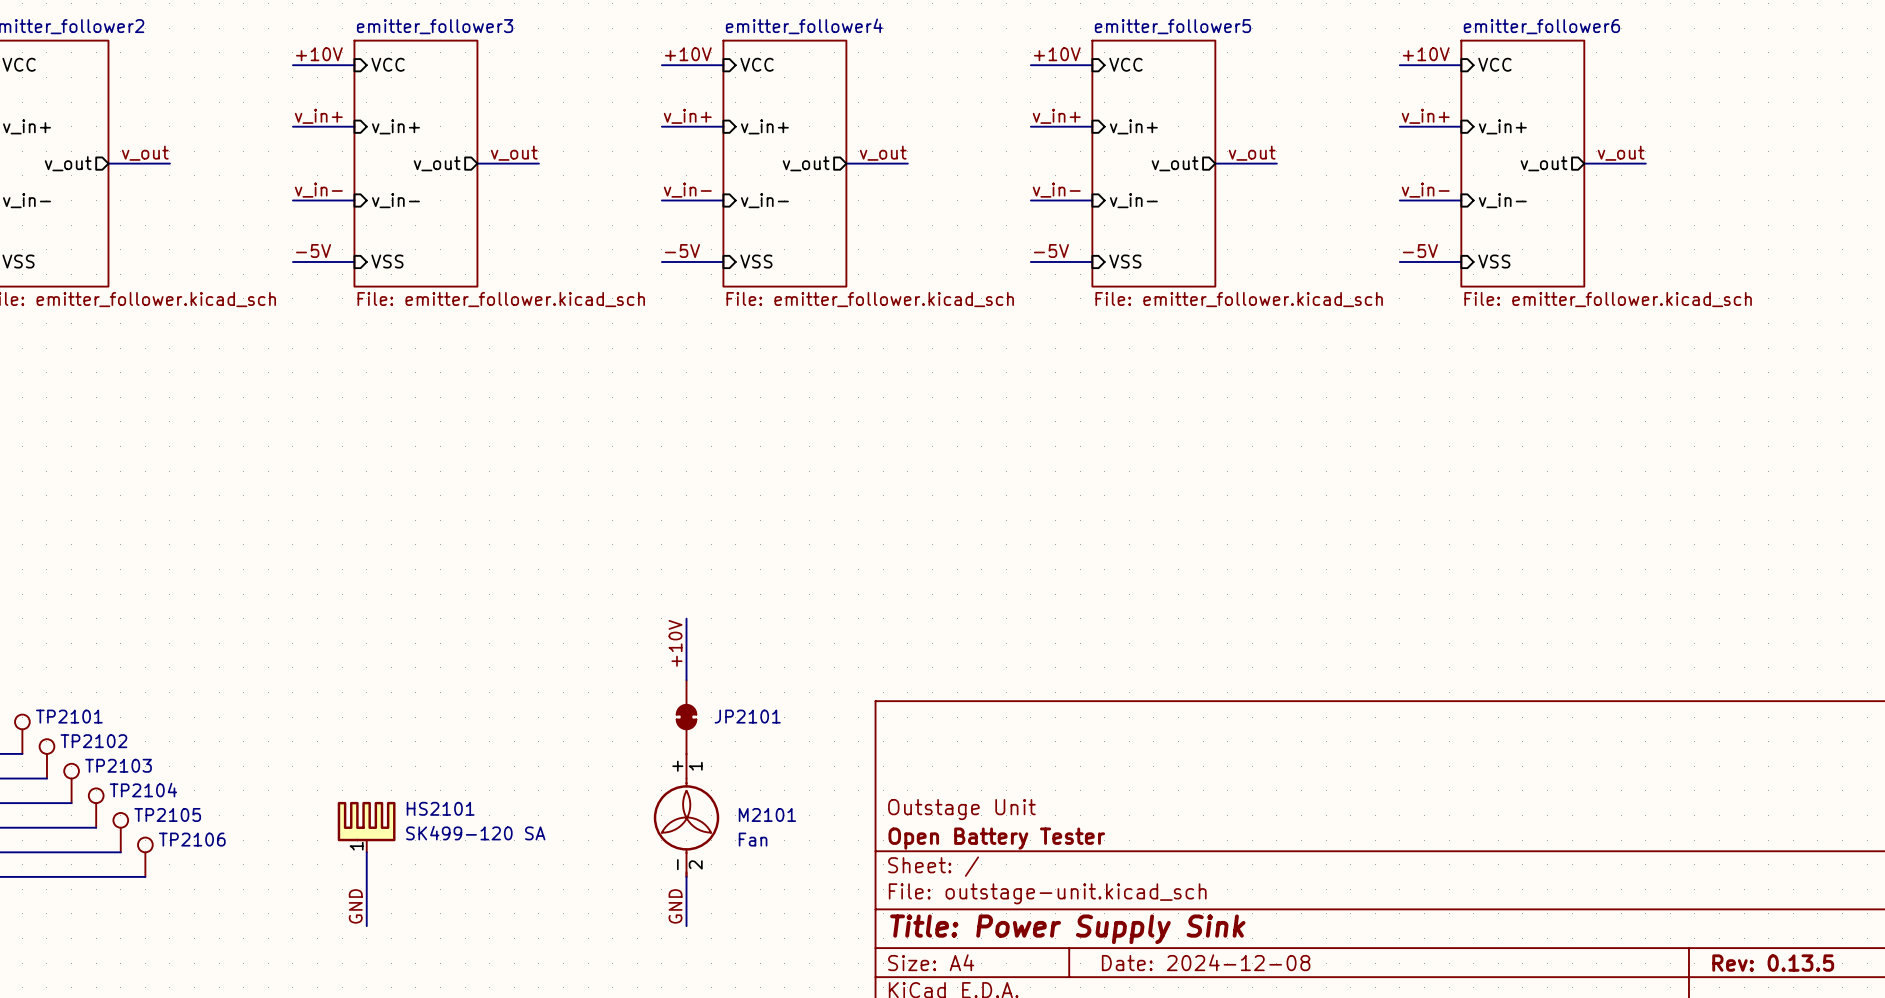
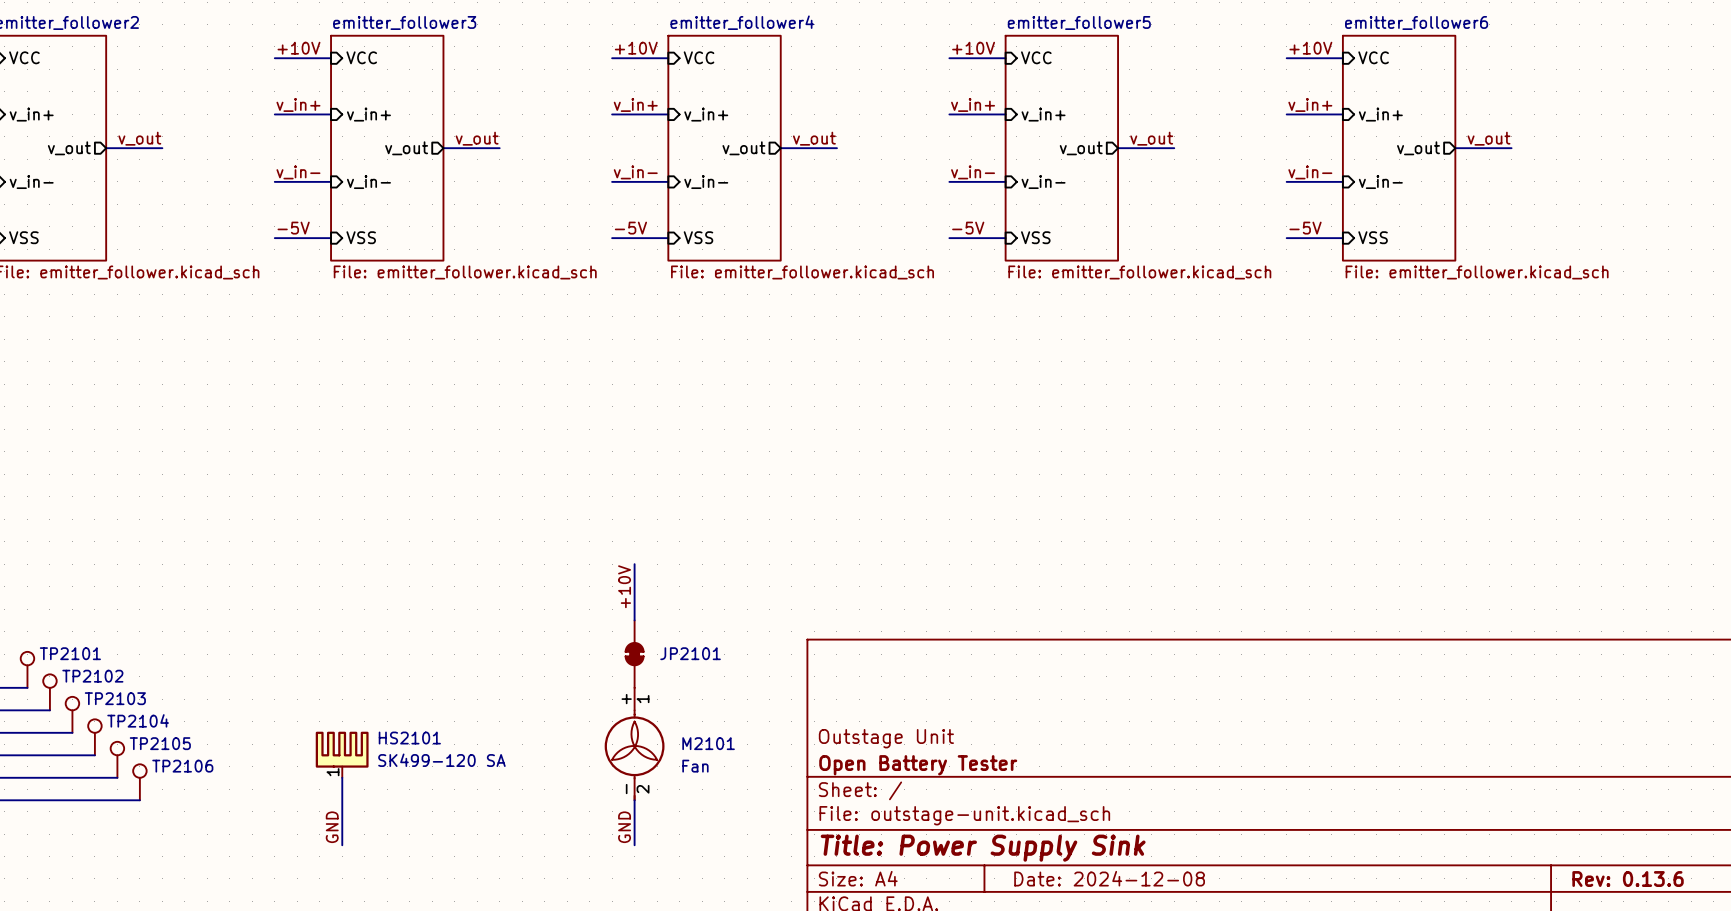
title block: Rev: 0.13.5 (1773, 963) -> Rev: 0.13.6 (1628, 879)

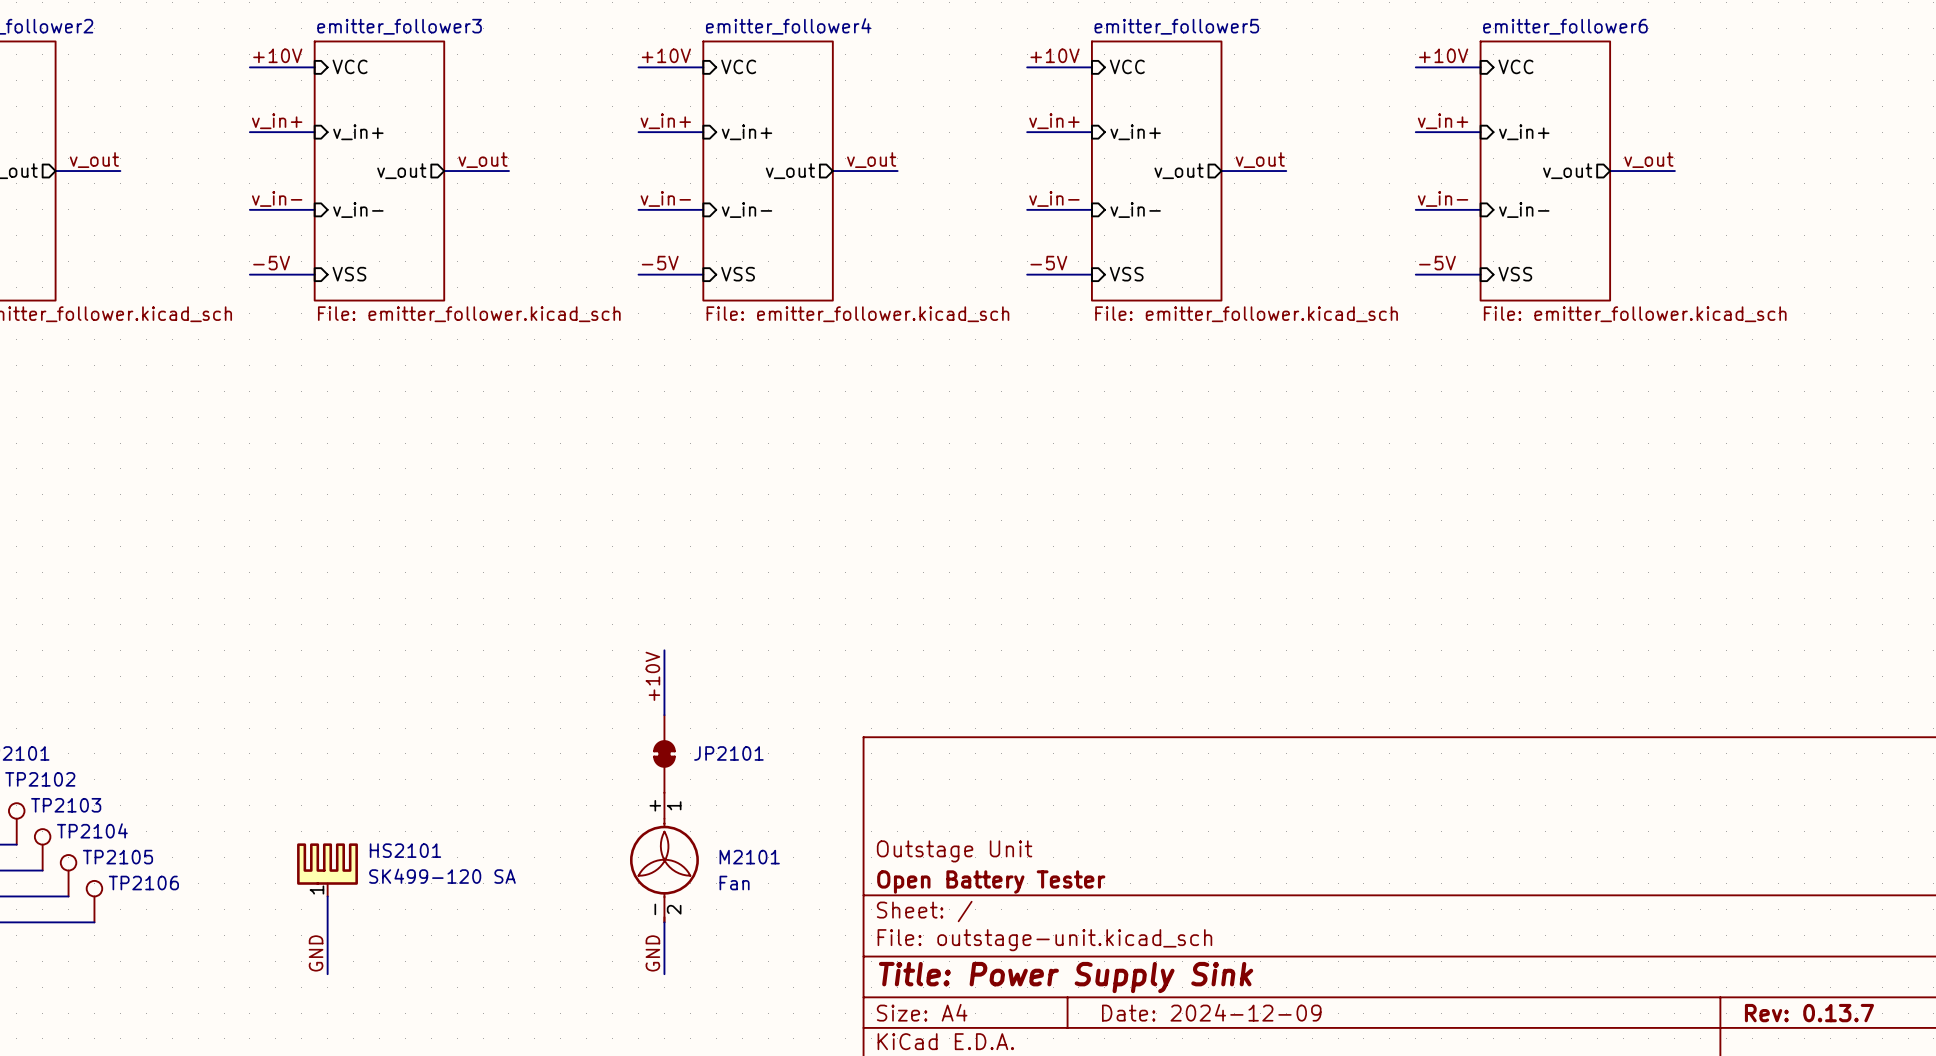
title block: Date: 2024-12-08 (1109, 878) -> Date: 2024-12-09 (1211, 1012)
title block: Rev: 0.13.6 (1628, 879) -> Rev: 0.13.7 (1809, 1013)

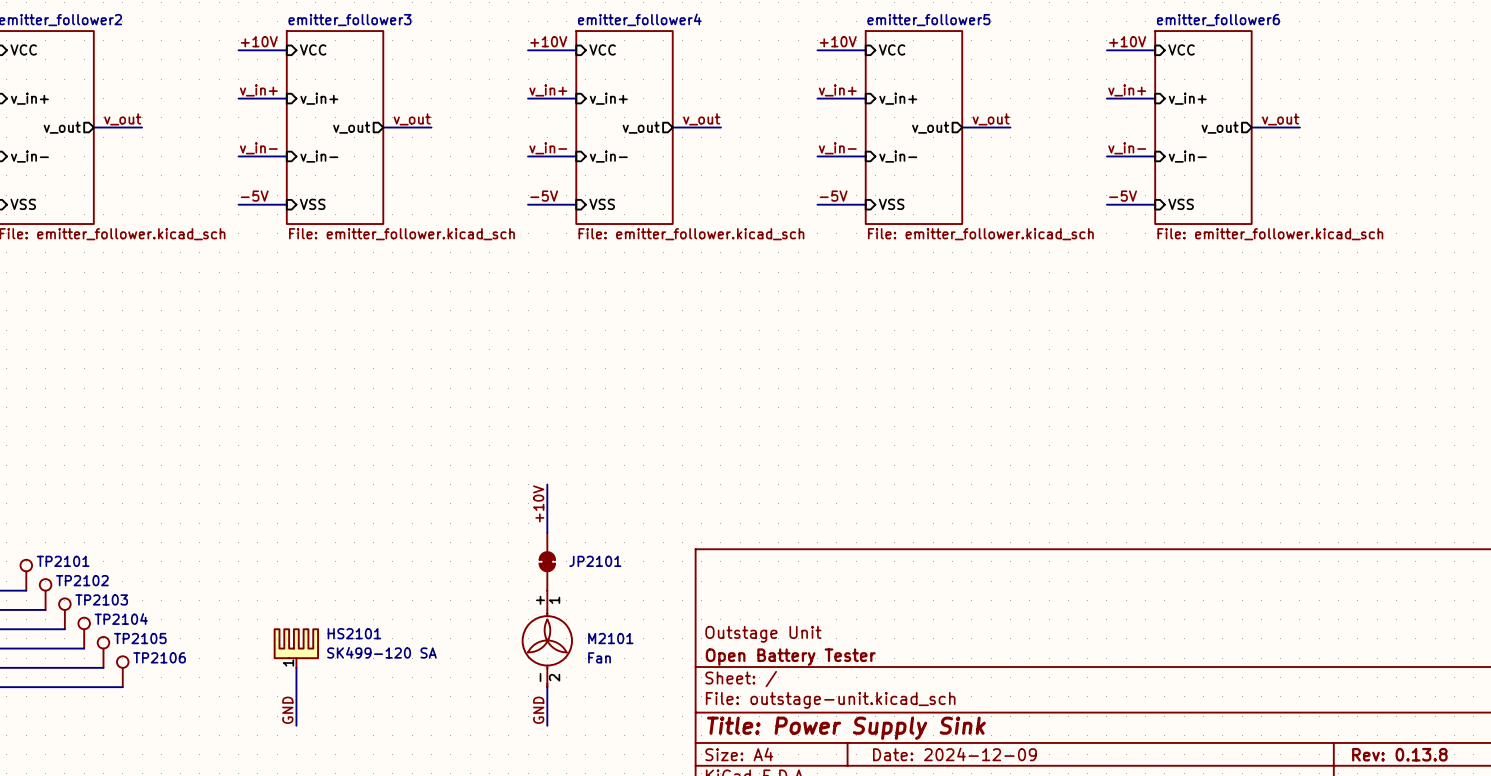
title block: Rev: 0.13.7 (1809, 1013) -> Rev: 0.13.8 (1399, 754)

